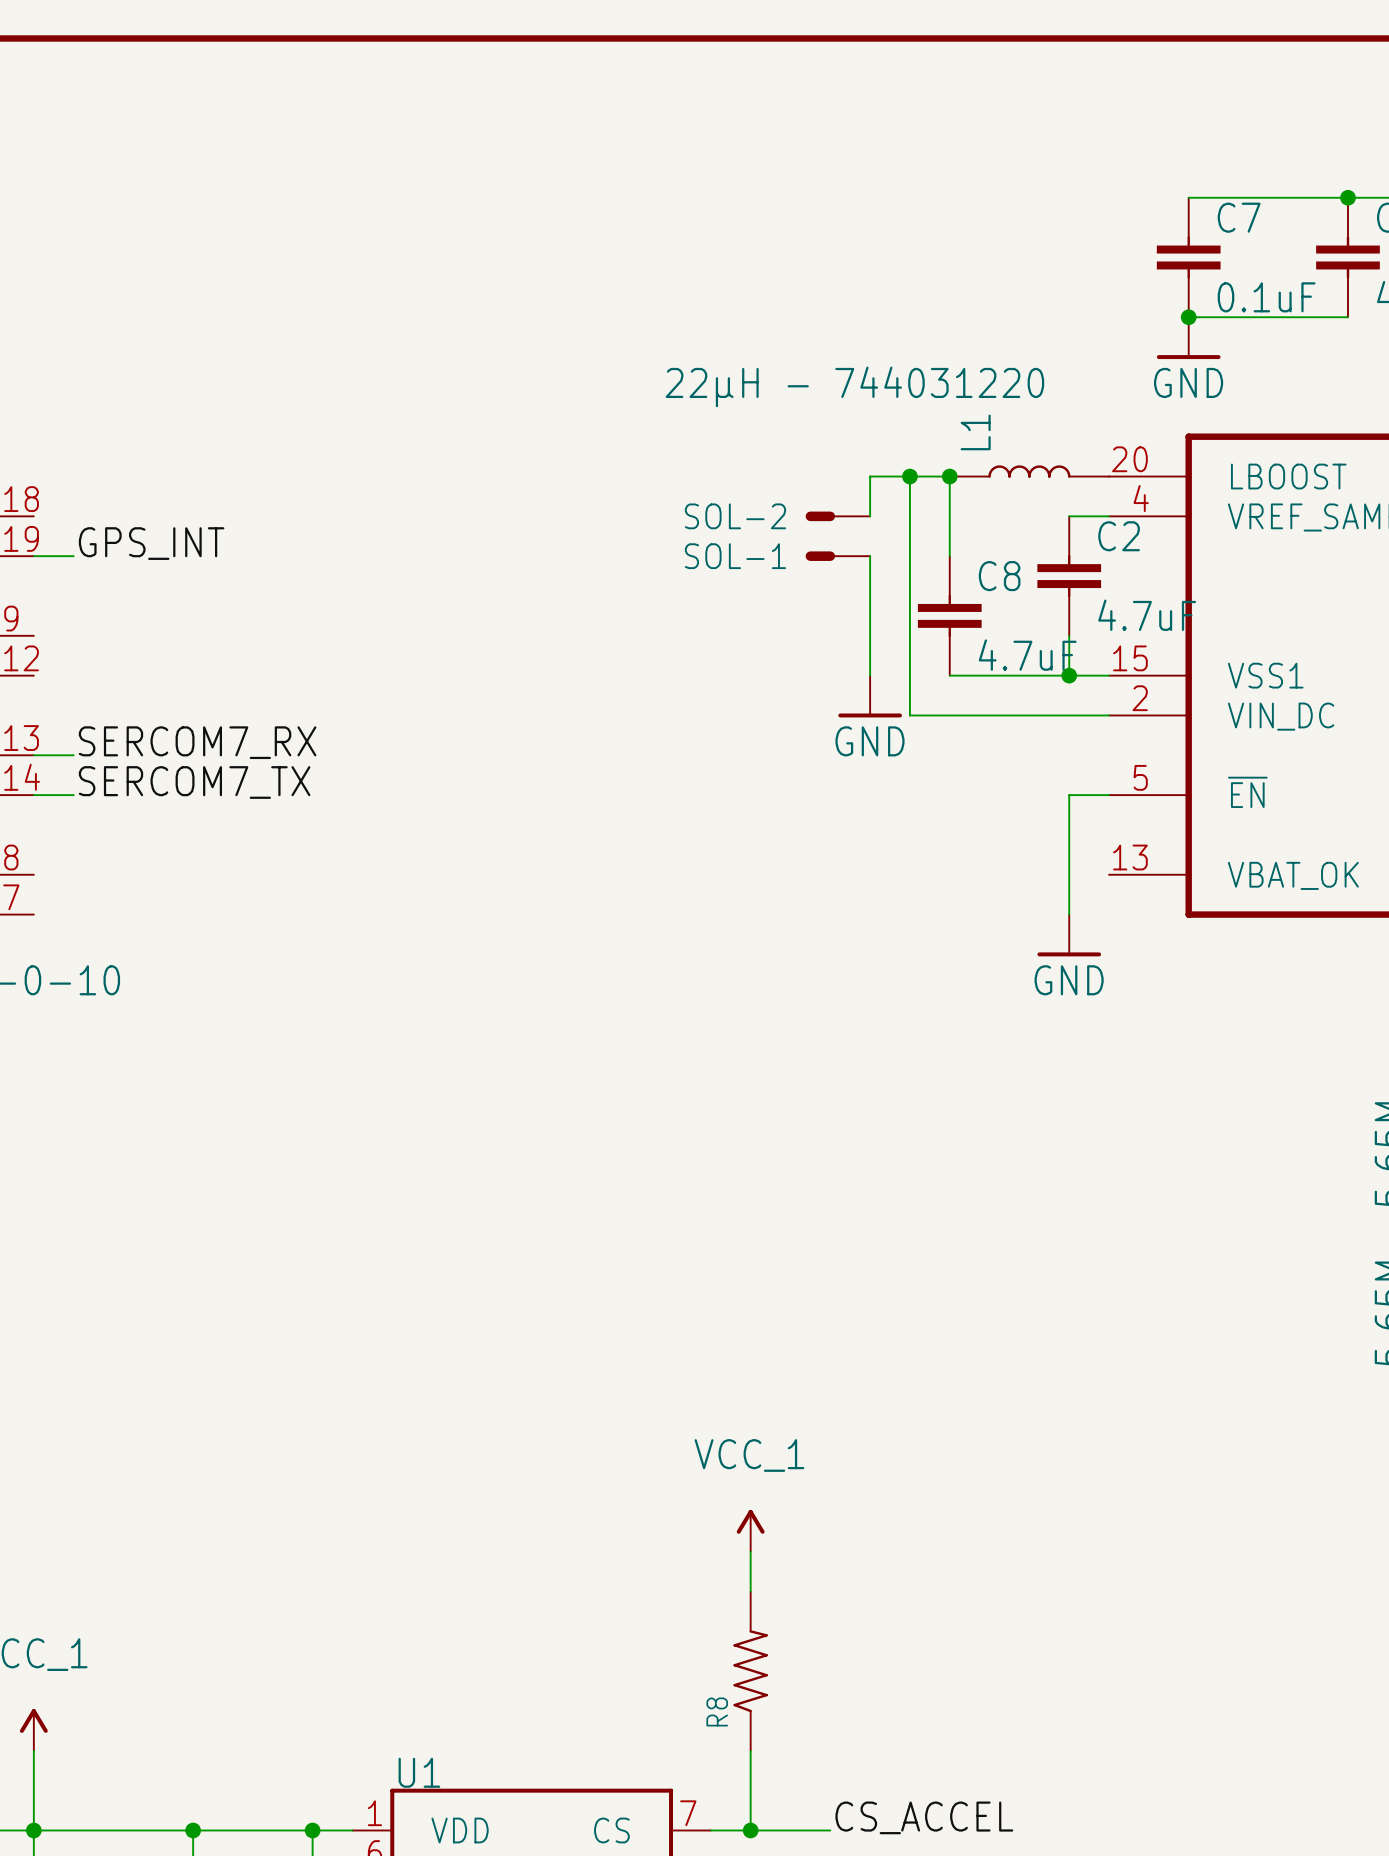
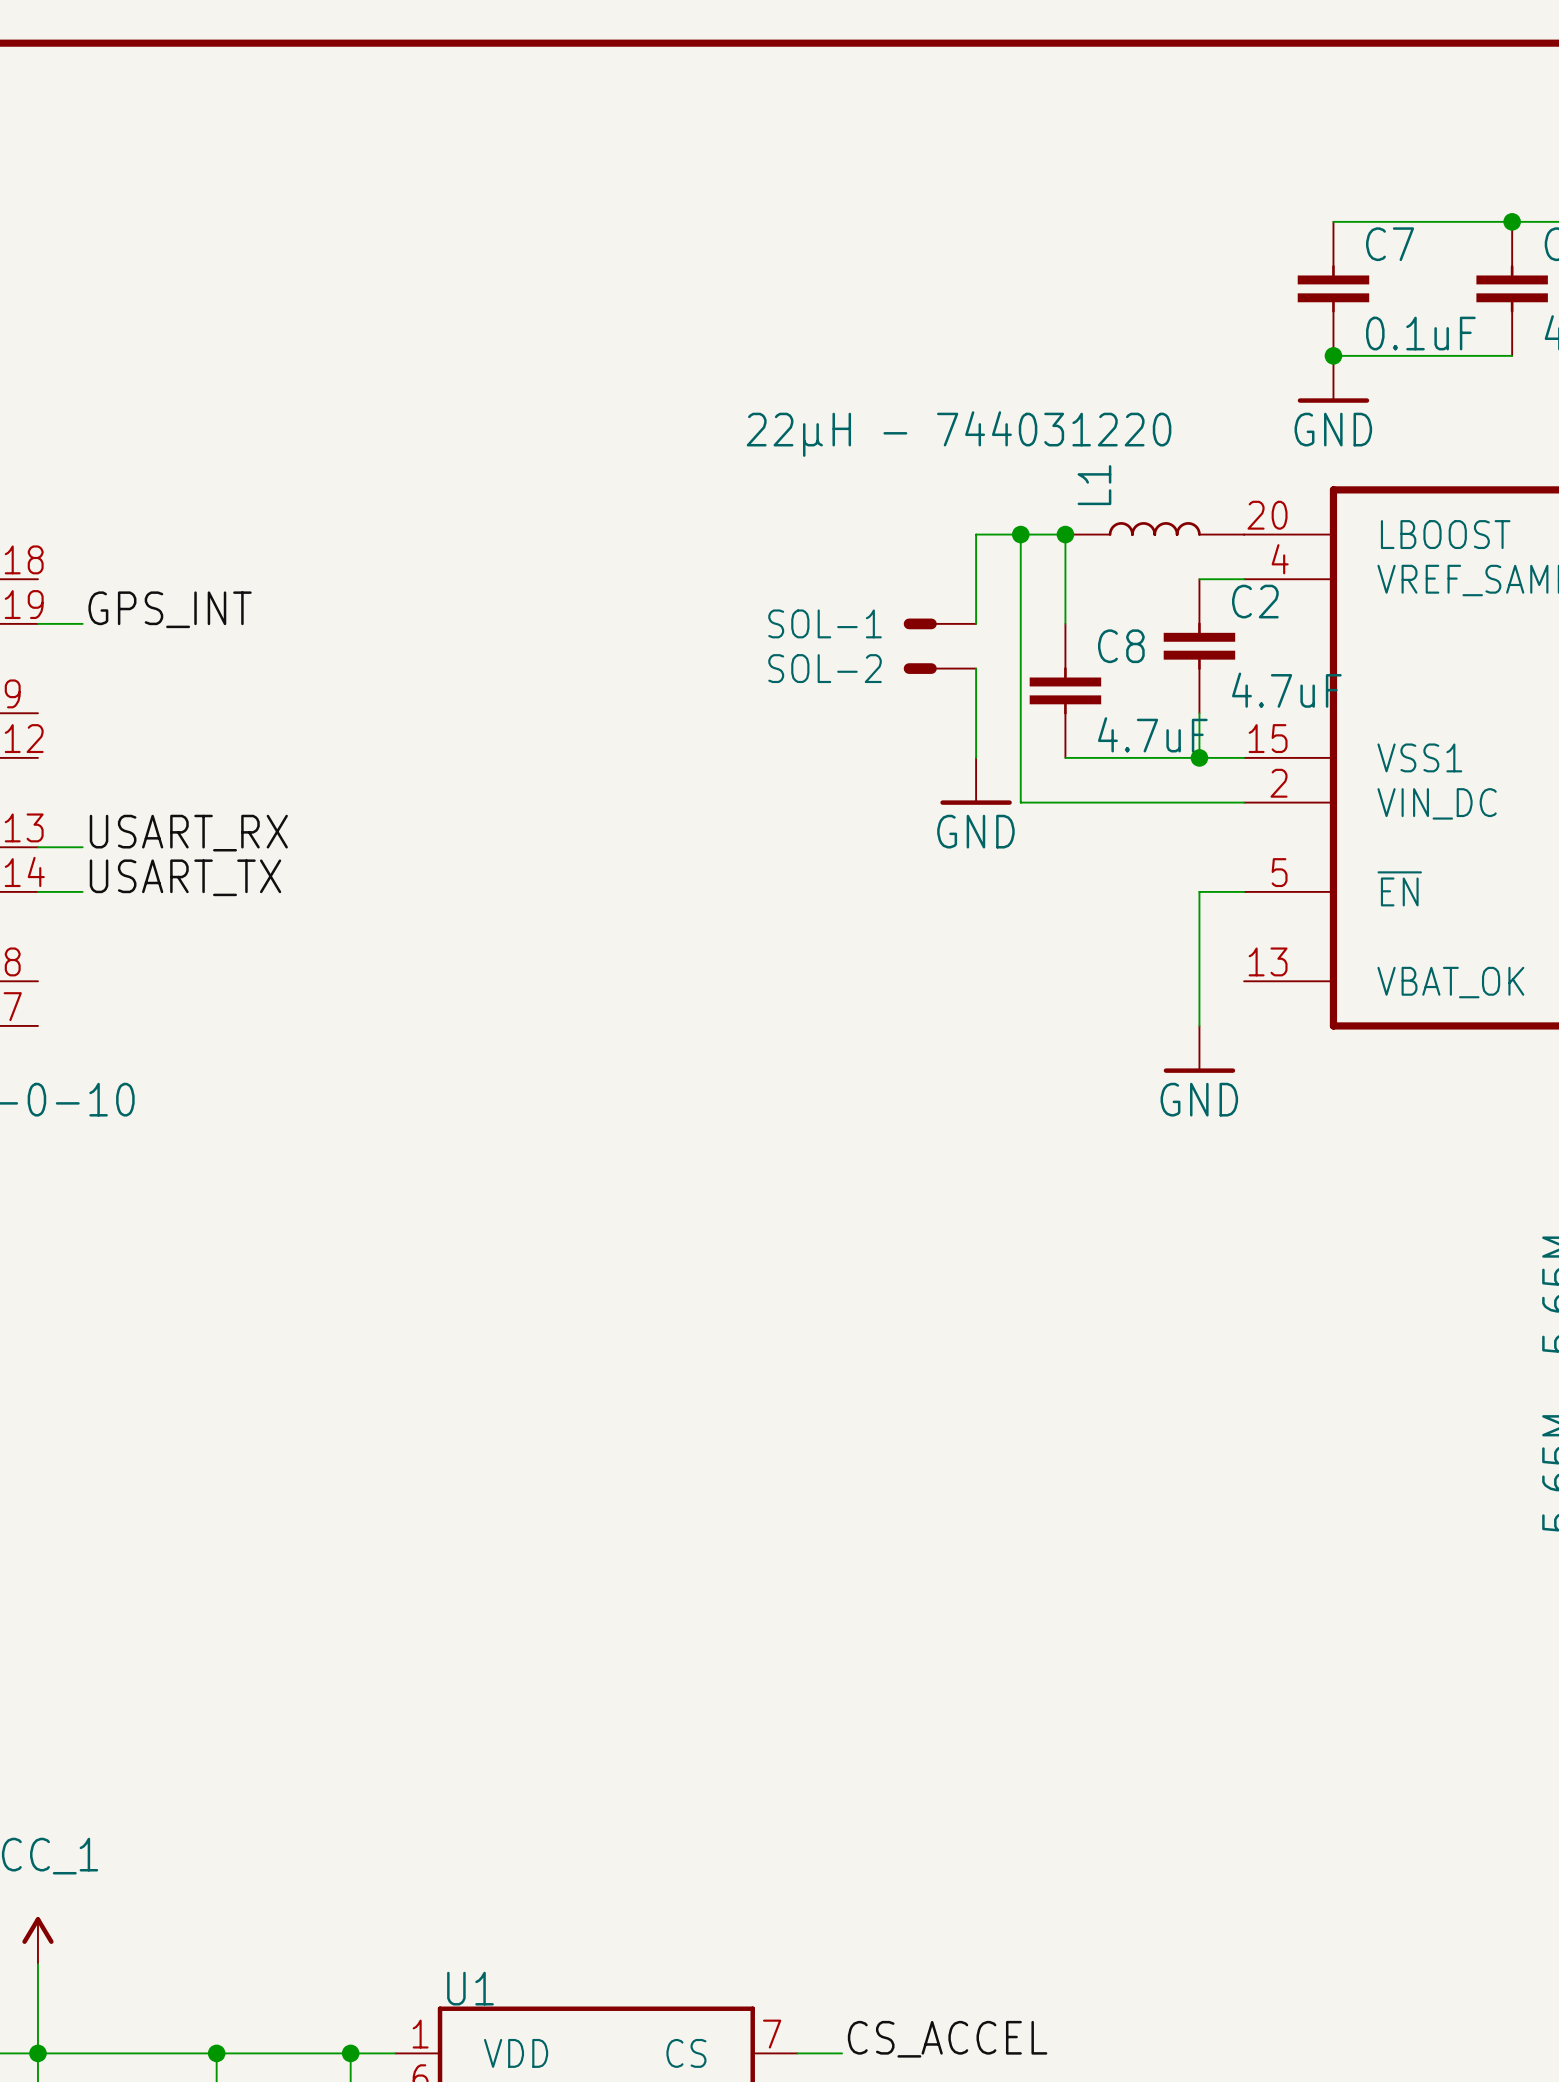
SOL-2 position: (837, 516) -> (939, 668)
wire: (870, 556) (870, 595) -> (976, 623) (976, 579)
label: SERCOM7_RX (197, 742) -> USART_RX (188, 833)
label: SERCOM7_TX (194, 782) -> USART_TX (185, 877)
power symbol: VCC_1 (750, 1530) -> none
wire: (750, 1551) (750, 1591) -> none
R8: (750, 1671) -> none
wire: (750, 1750) (750, 1830) (830, 1830) -> none
label position: CS_ACCEL (924, 1817) -> CS_ACCEL (947, 2039)
junction: (750, 1830) -> none

